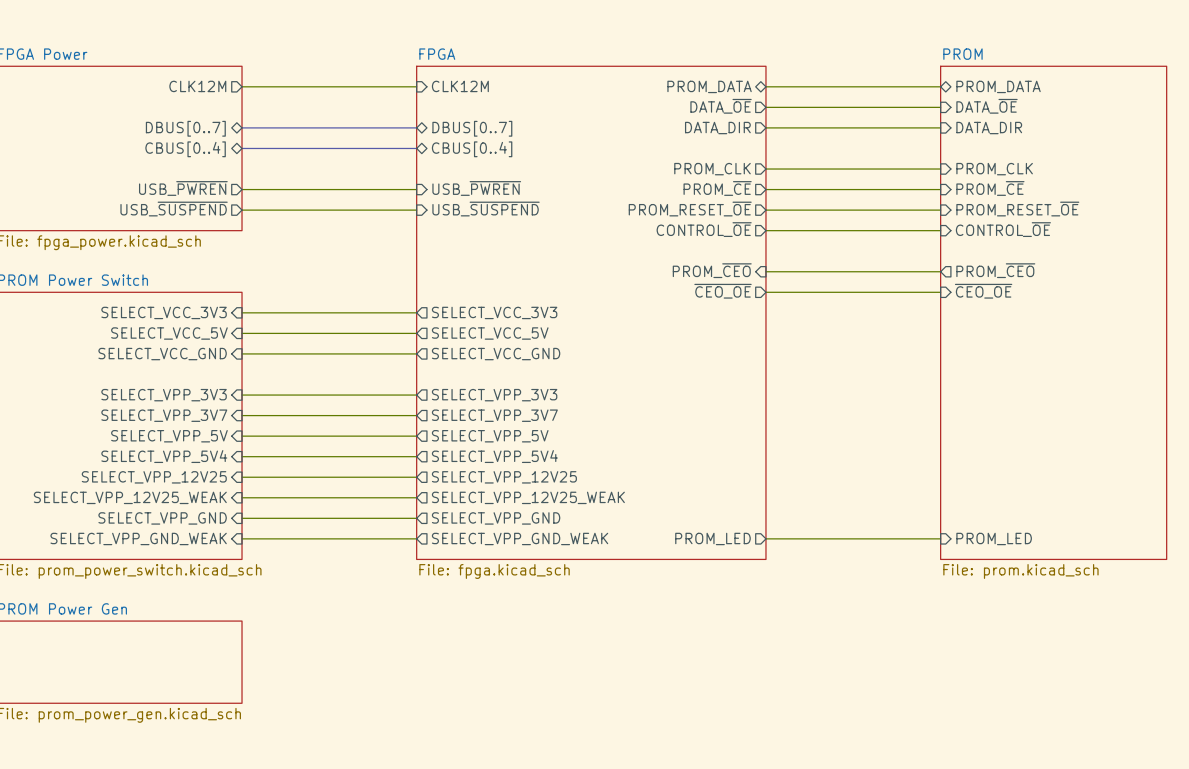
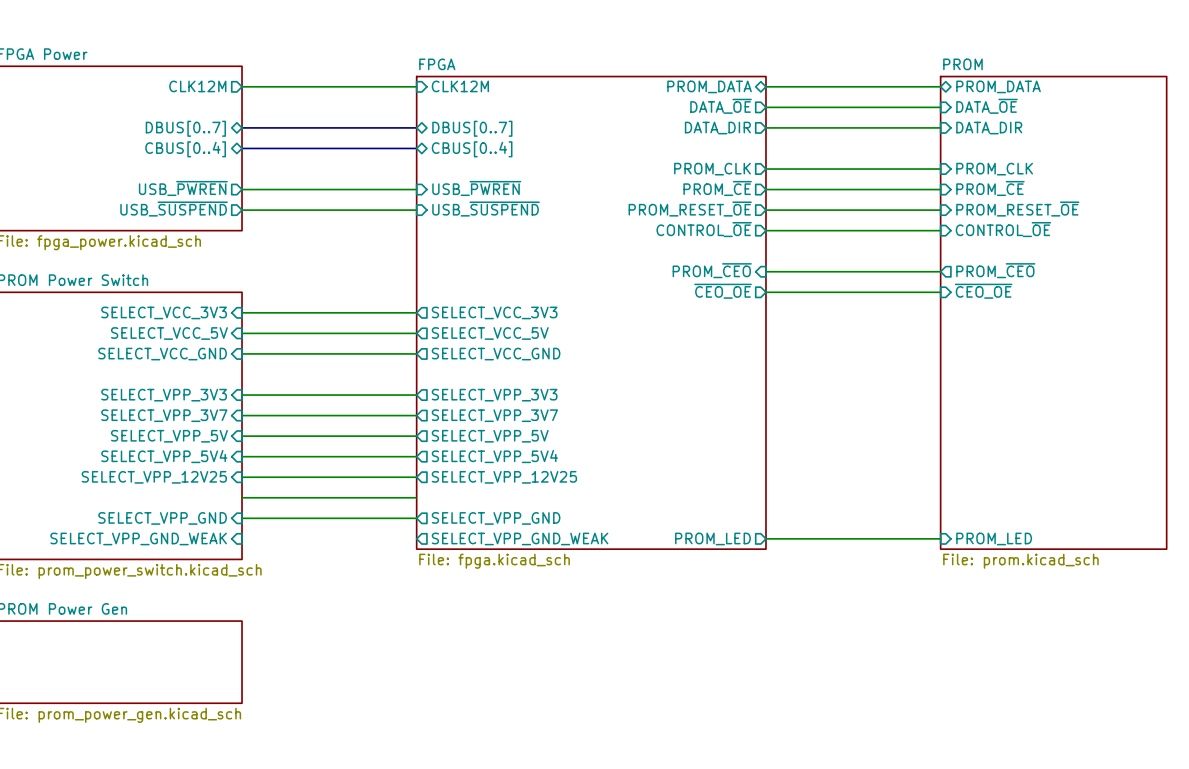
sheet FPGA shape: [416, 65, 767, 561] -> [416, 75, 767, 550]
sheet PROM shape: [940, 65, 1168, 561] -> [940, 75, 1168, 550]
sheet pin: SELECT_VPP_12V25_WEAK (130, 497) -> none
sheet pin: SELECT_VPP_12V25_WEAK (528, 497) -> none
wire: (242, 538) (416, 538) -> none

